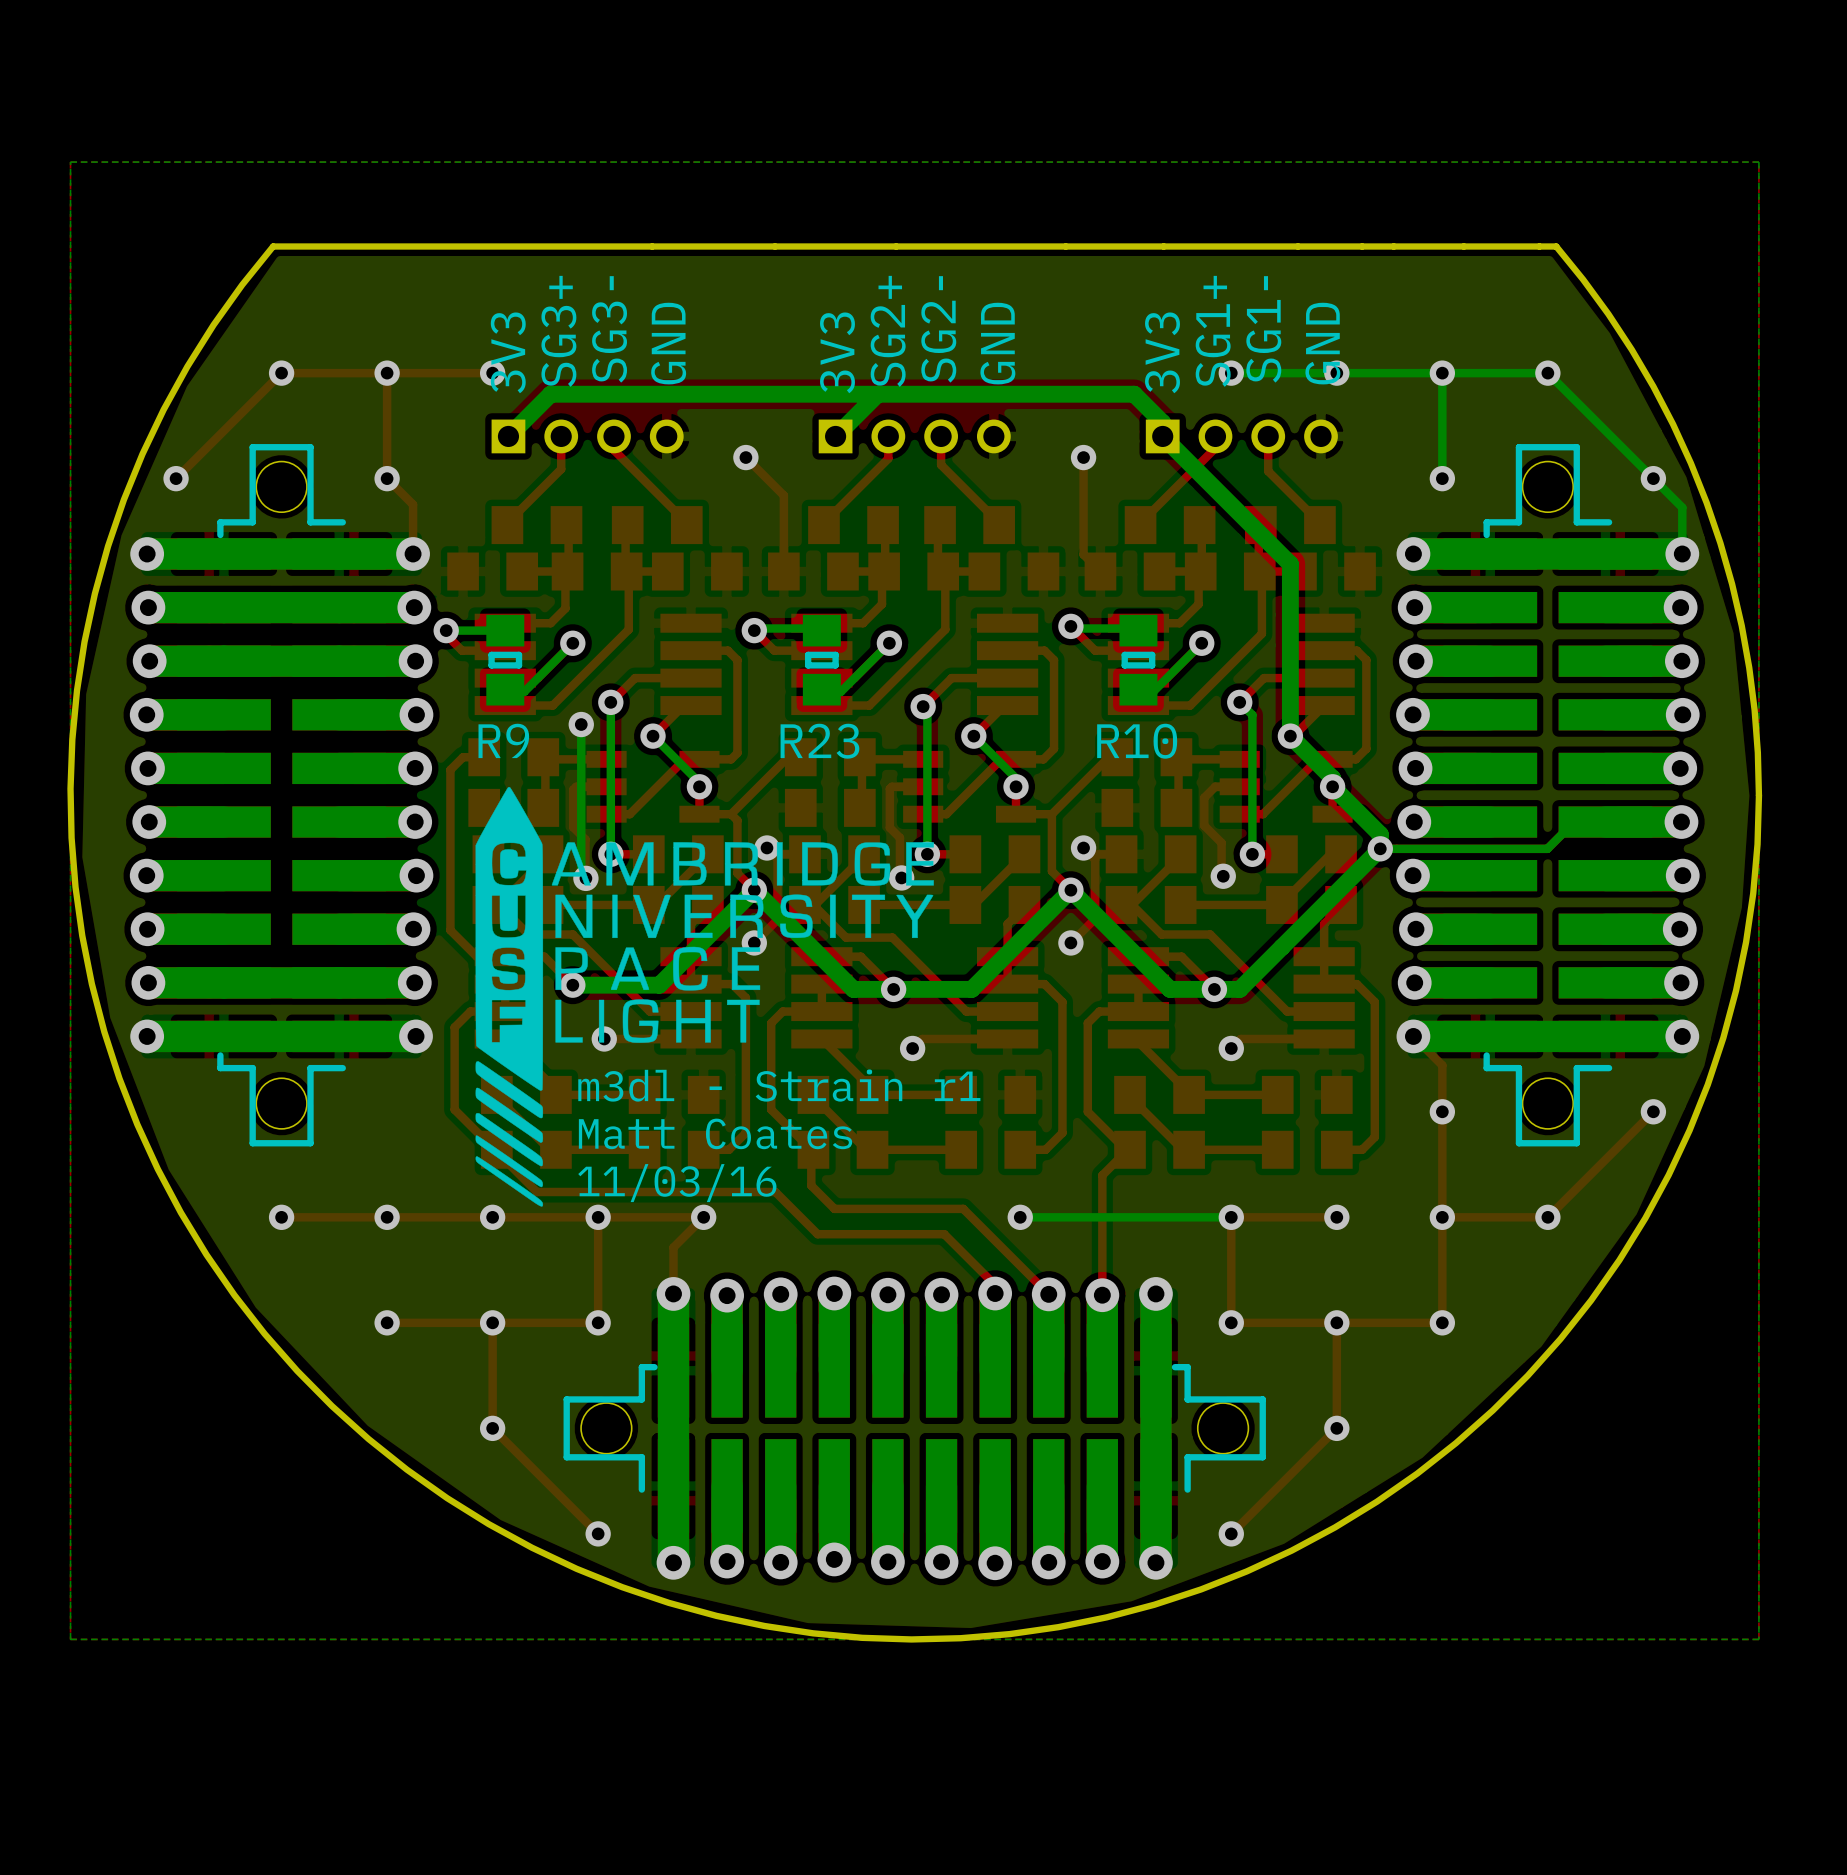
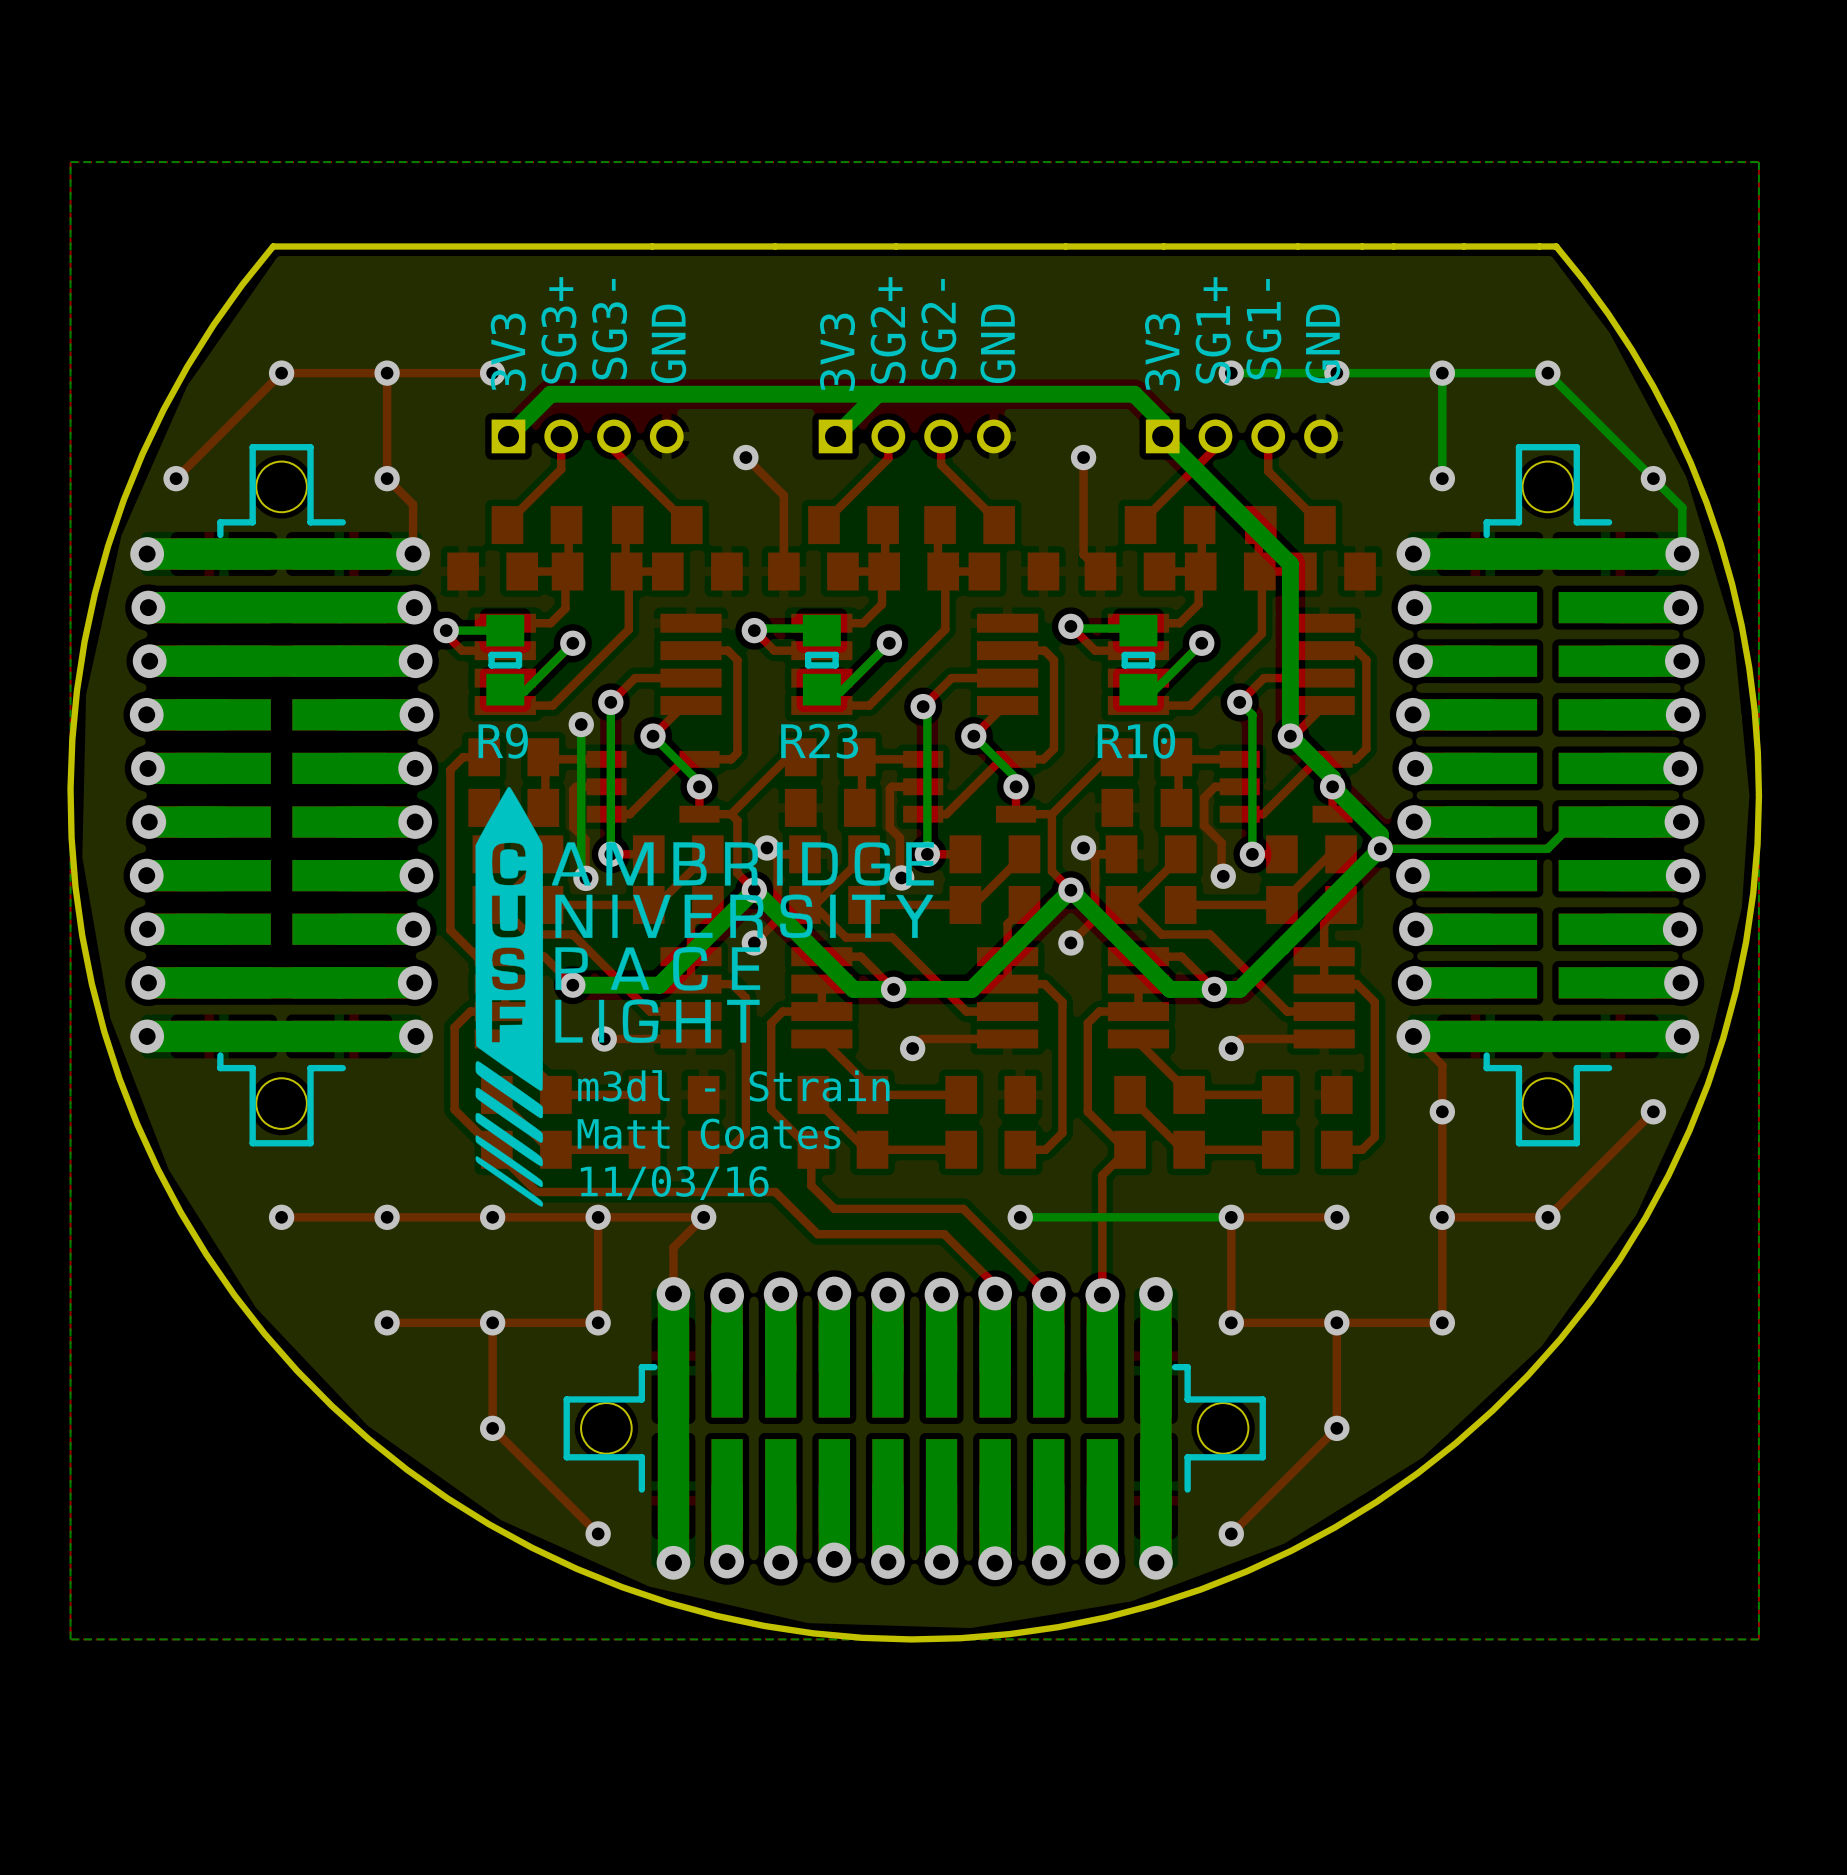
text: m3dl - Strain r1 (779, 1085) -> m3dl - Strain (733, 1085)

